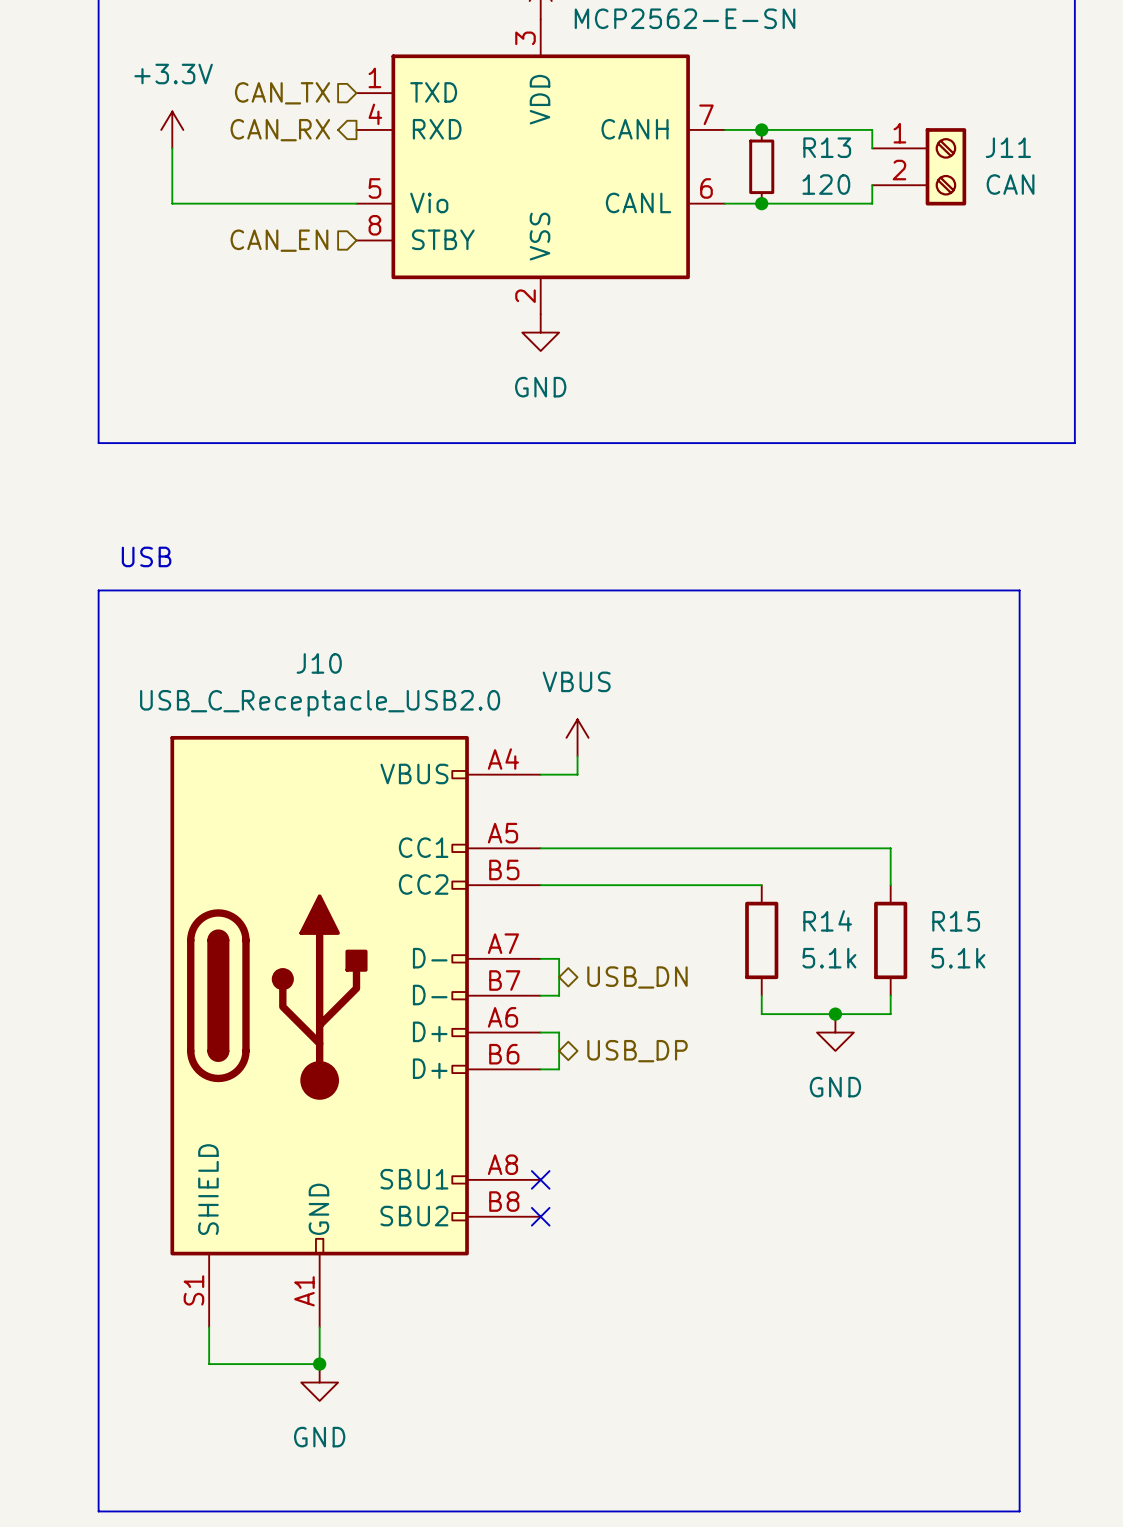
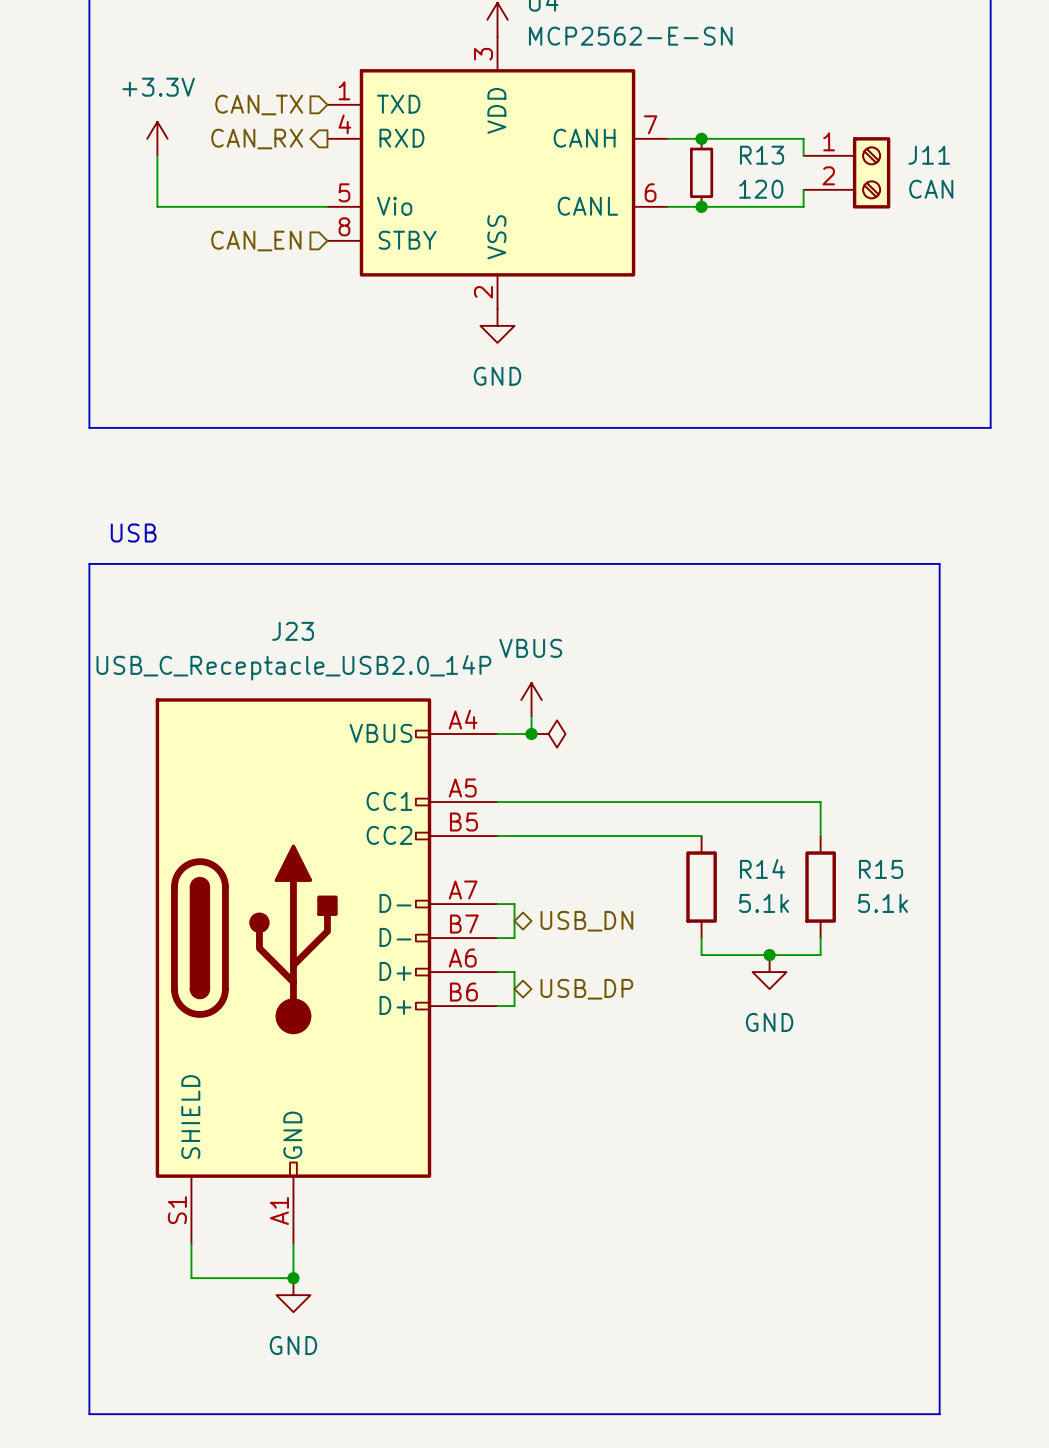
junction: none -> (531, 734)
power symbol: none -> (548, 734)
J10: USB_C_Receptacle_USB2.0 (355, 1031) -> none
J23: none -> USB_C_Receptacle_USB2.0_14P (326, 971)
no-connect mark: (540, 1179) -> none
no-connect mark: (540, 1216) -> none

